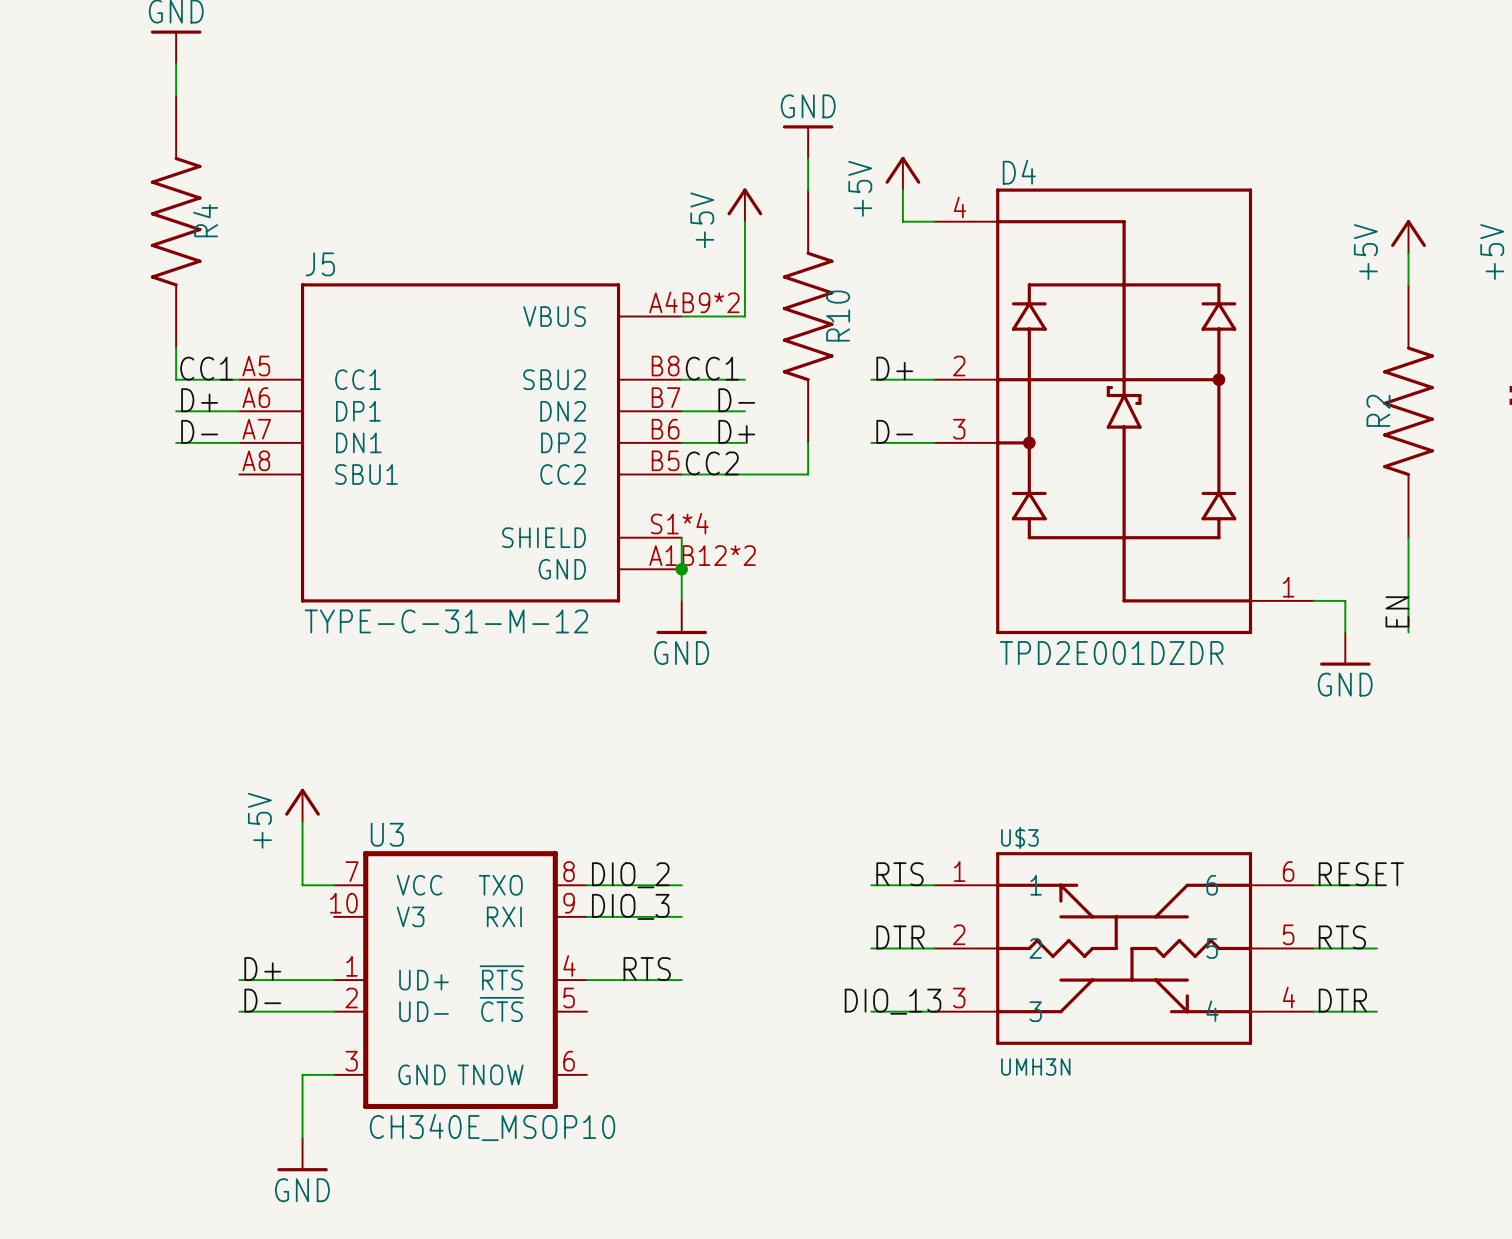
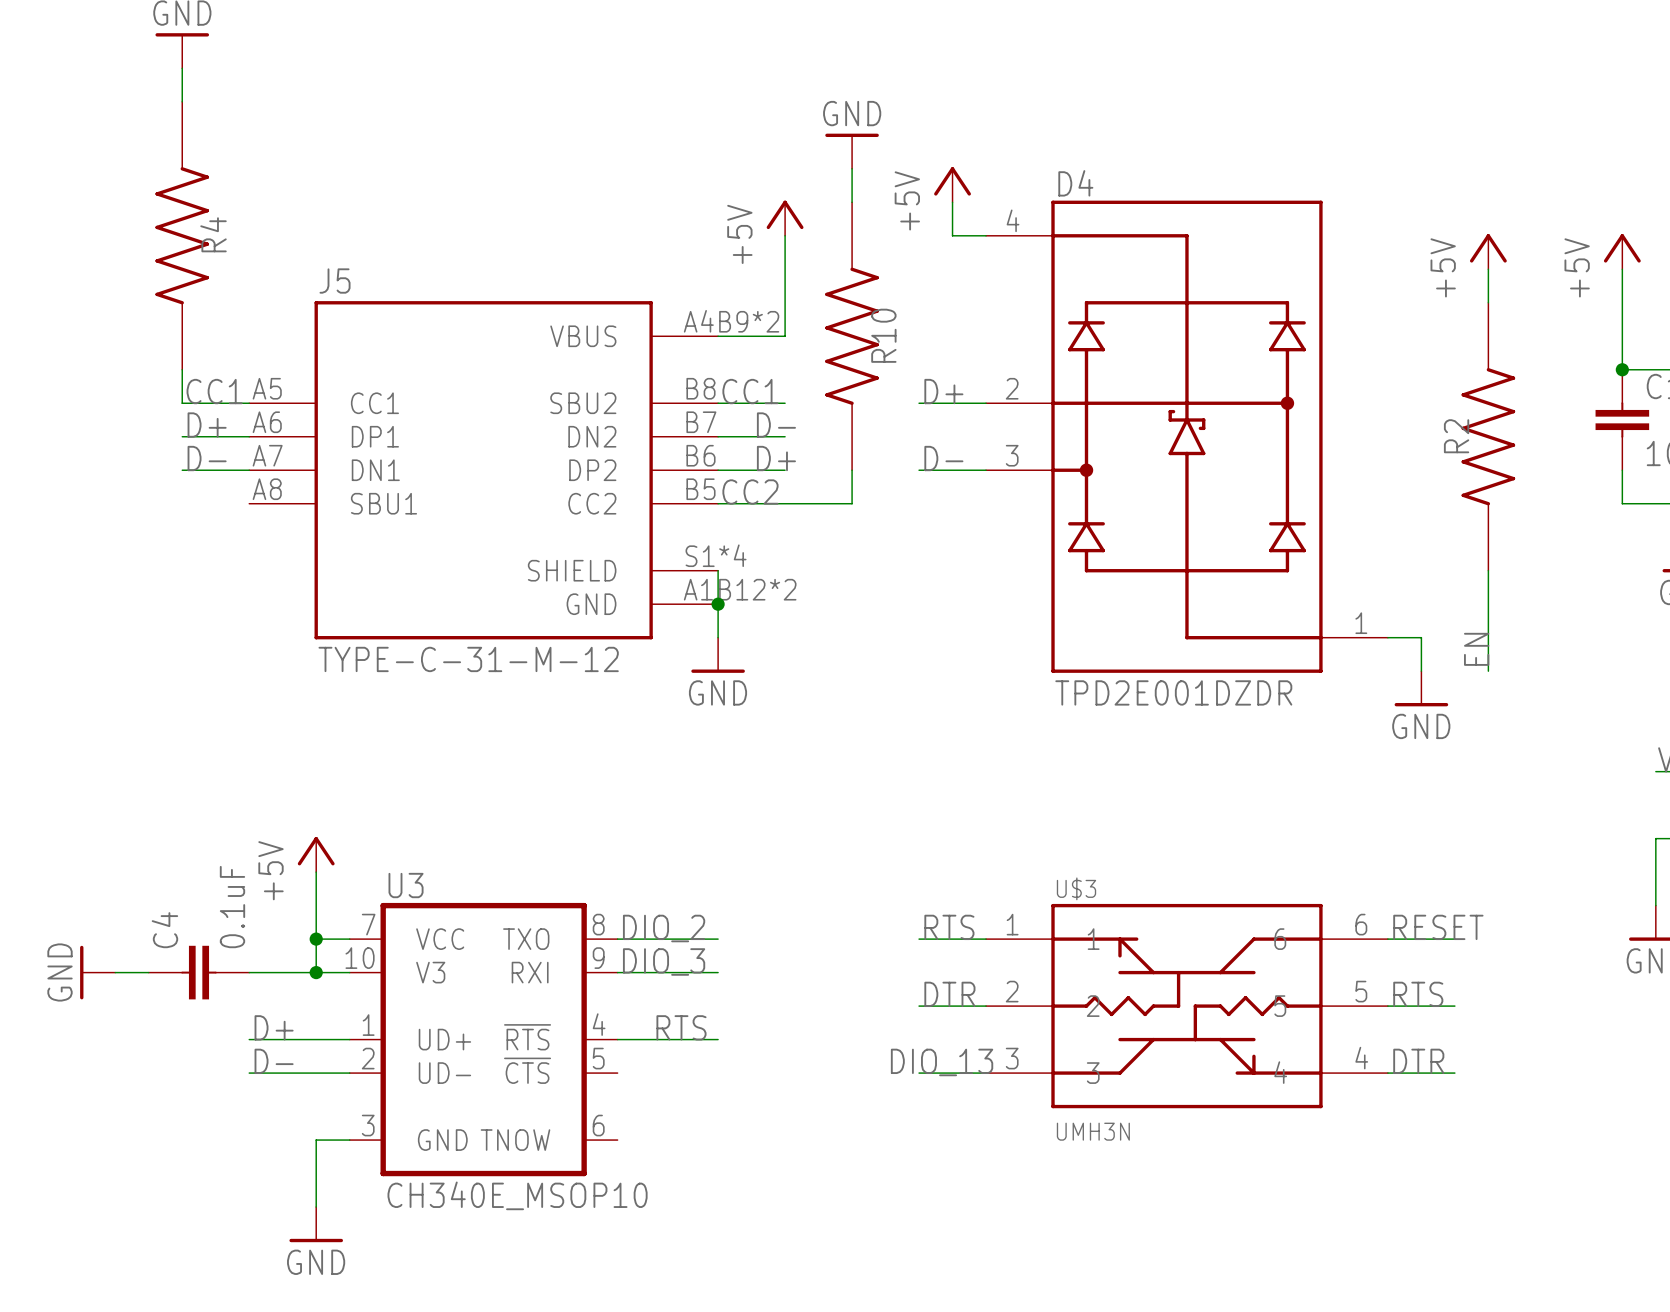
wire: none -> (316, 939) (316, 972)
junction: none -> (316, 939)
power symbol: none -> GND (97, 972)
wire: none -> (115, 972) (148, 972)
C4: none -> 0.1uF (198, 972)
wire: none -> (249, 972) (349, 972)
junction: none -> (316, 972)

